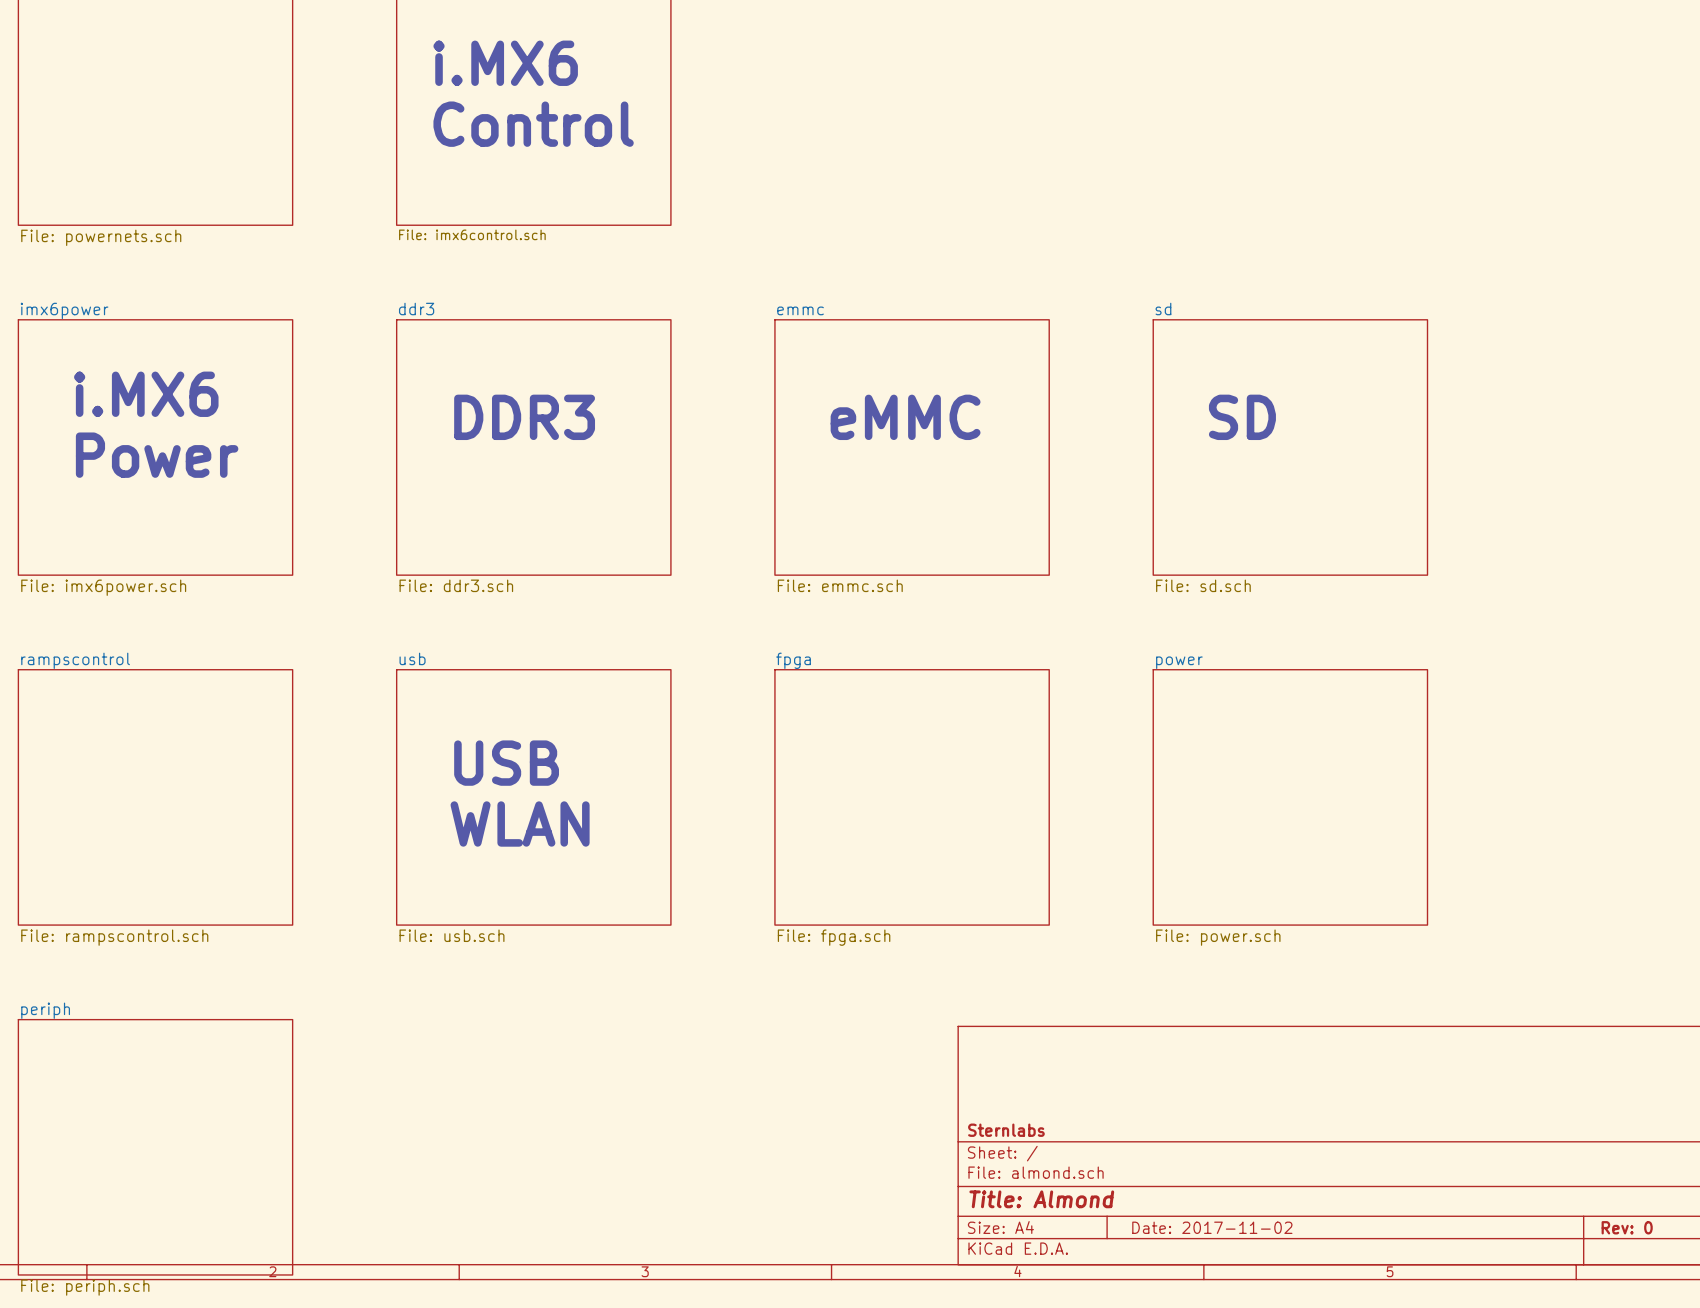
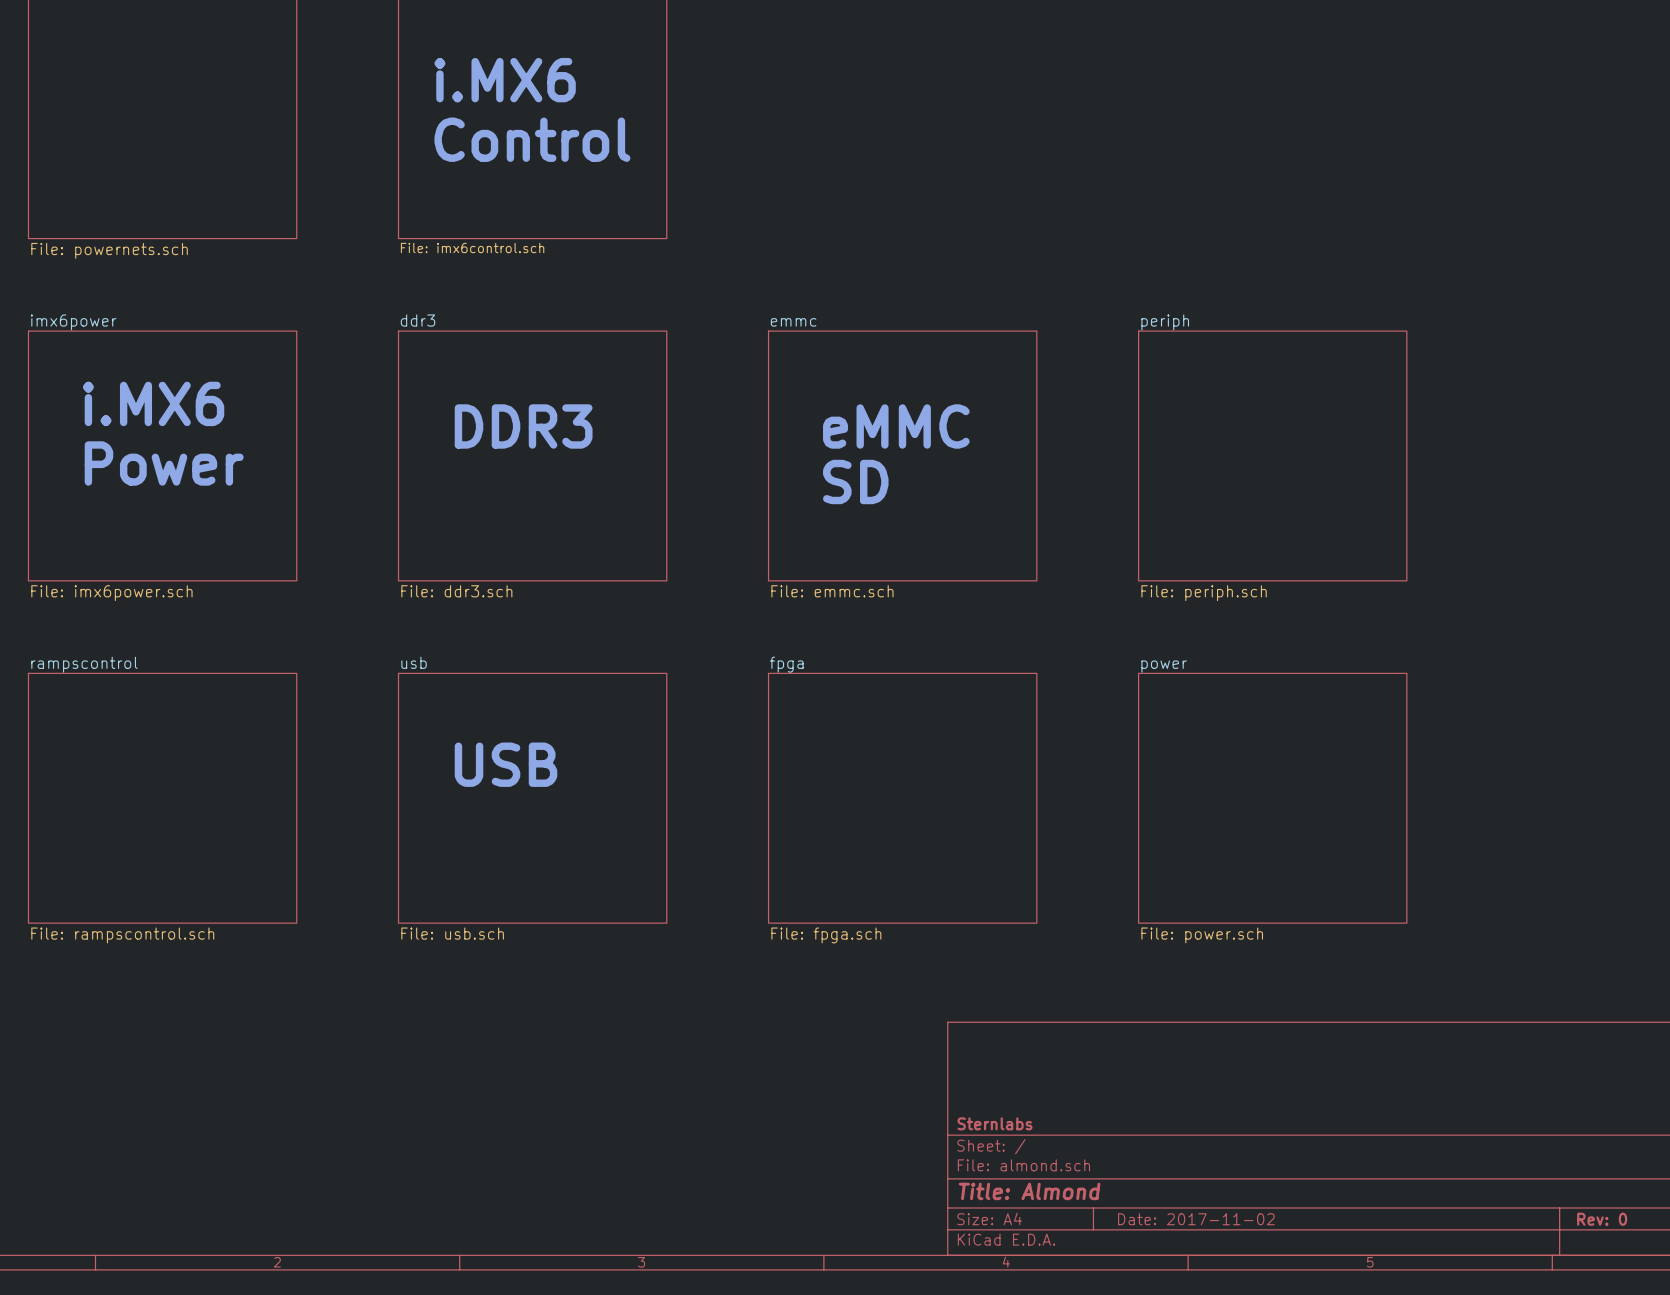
sheet sd name: sd (1163, 309) -> periph (1165, 322)
text: SD (1242, 417) -> none
text: none -> SD (855, 481)
sheet sd value: File: sd.sch (1203, 585) -> File: periph.sch (1204, 593)
text: WLAN (520, 823) -> none
sheet periph: File: periph.sch (155, 1147) -> none

